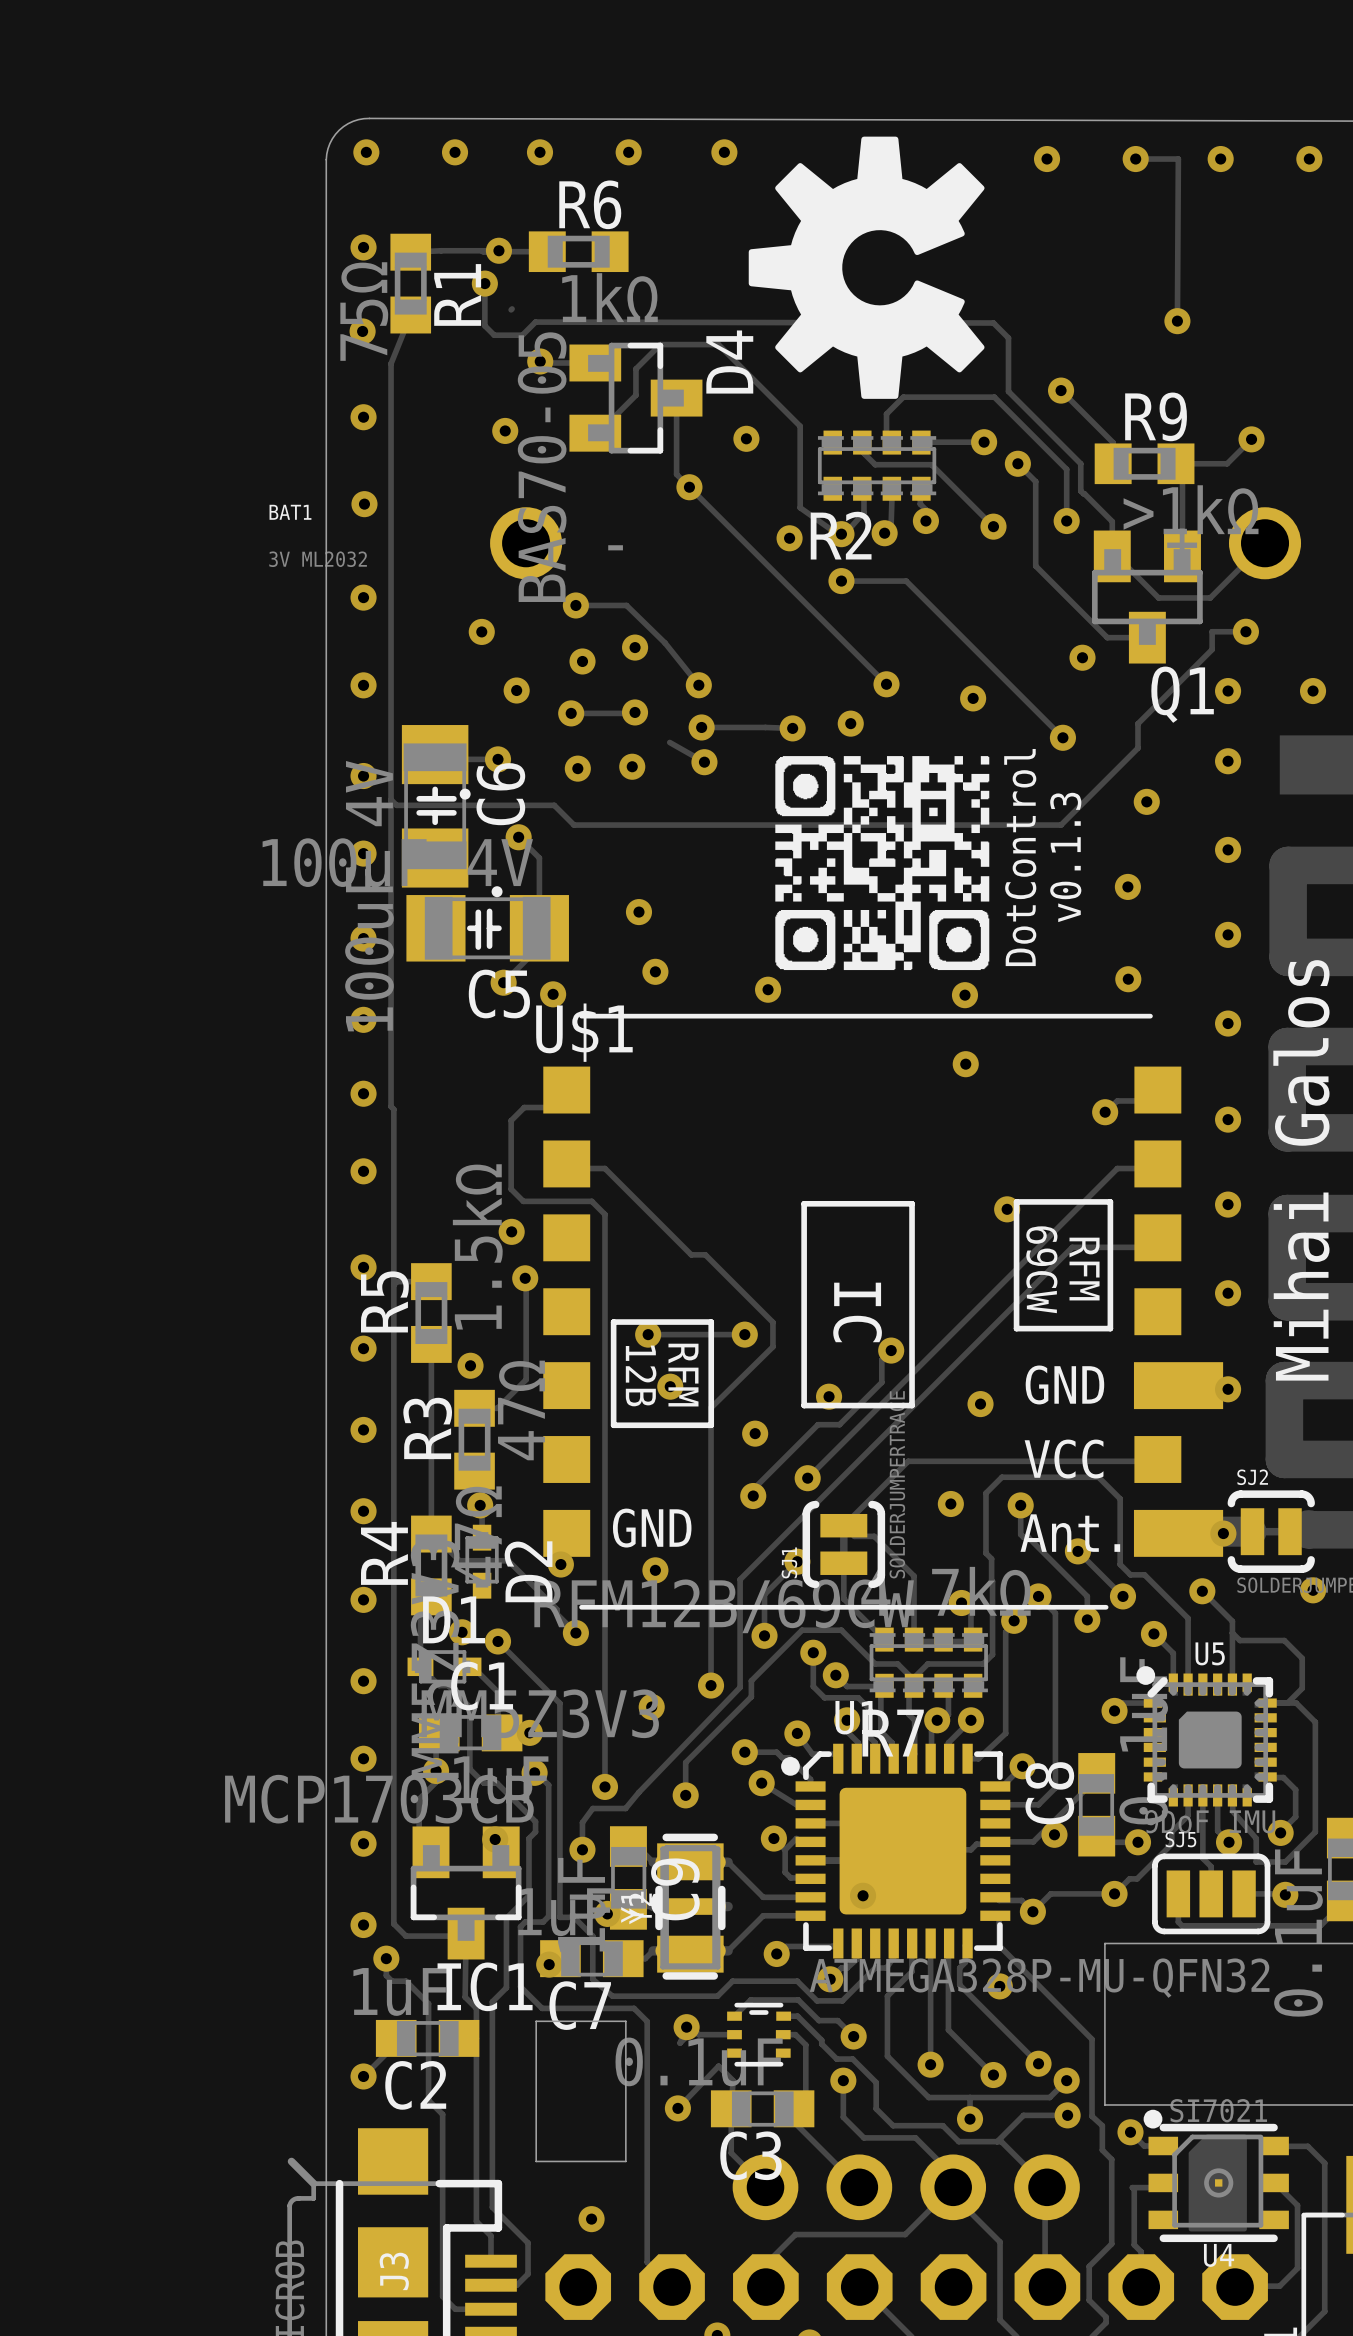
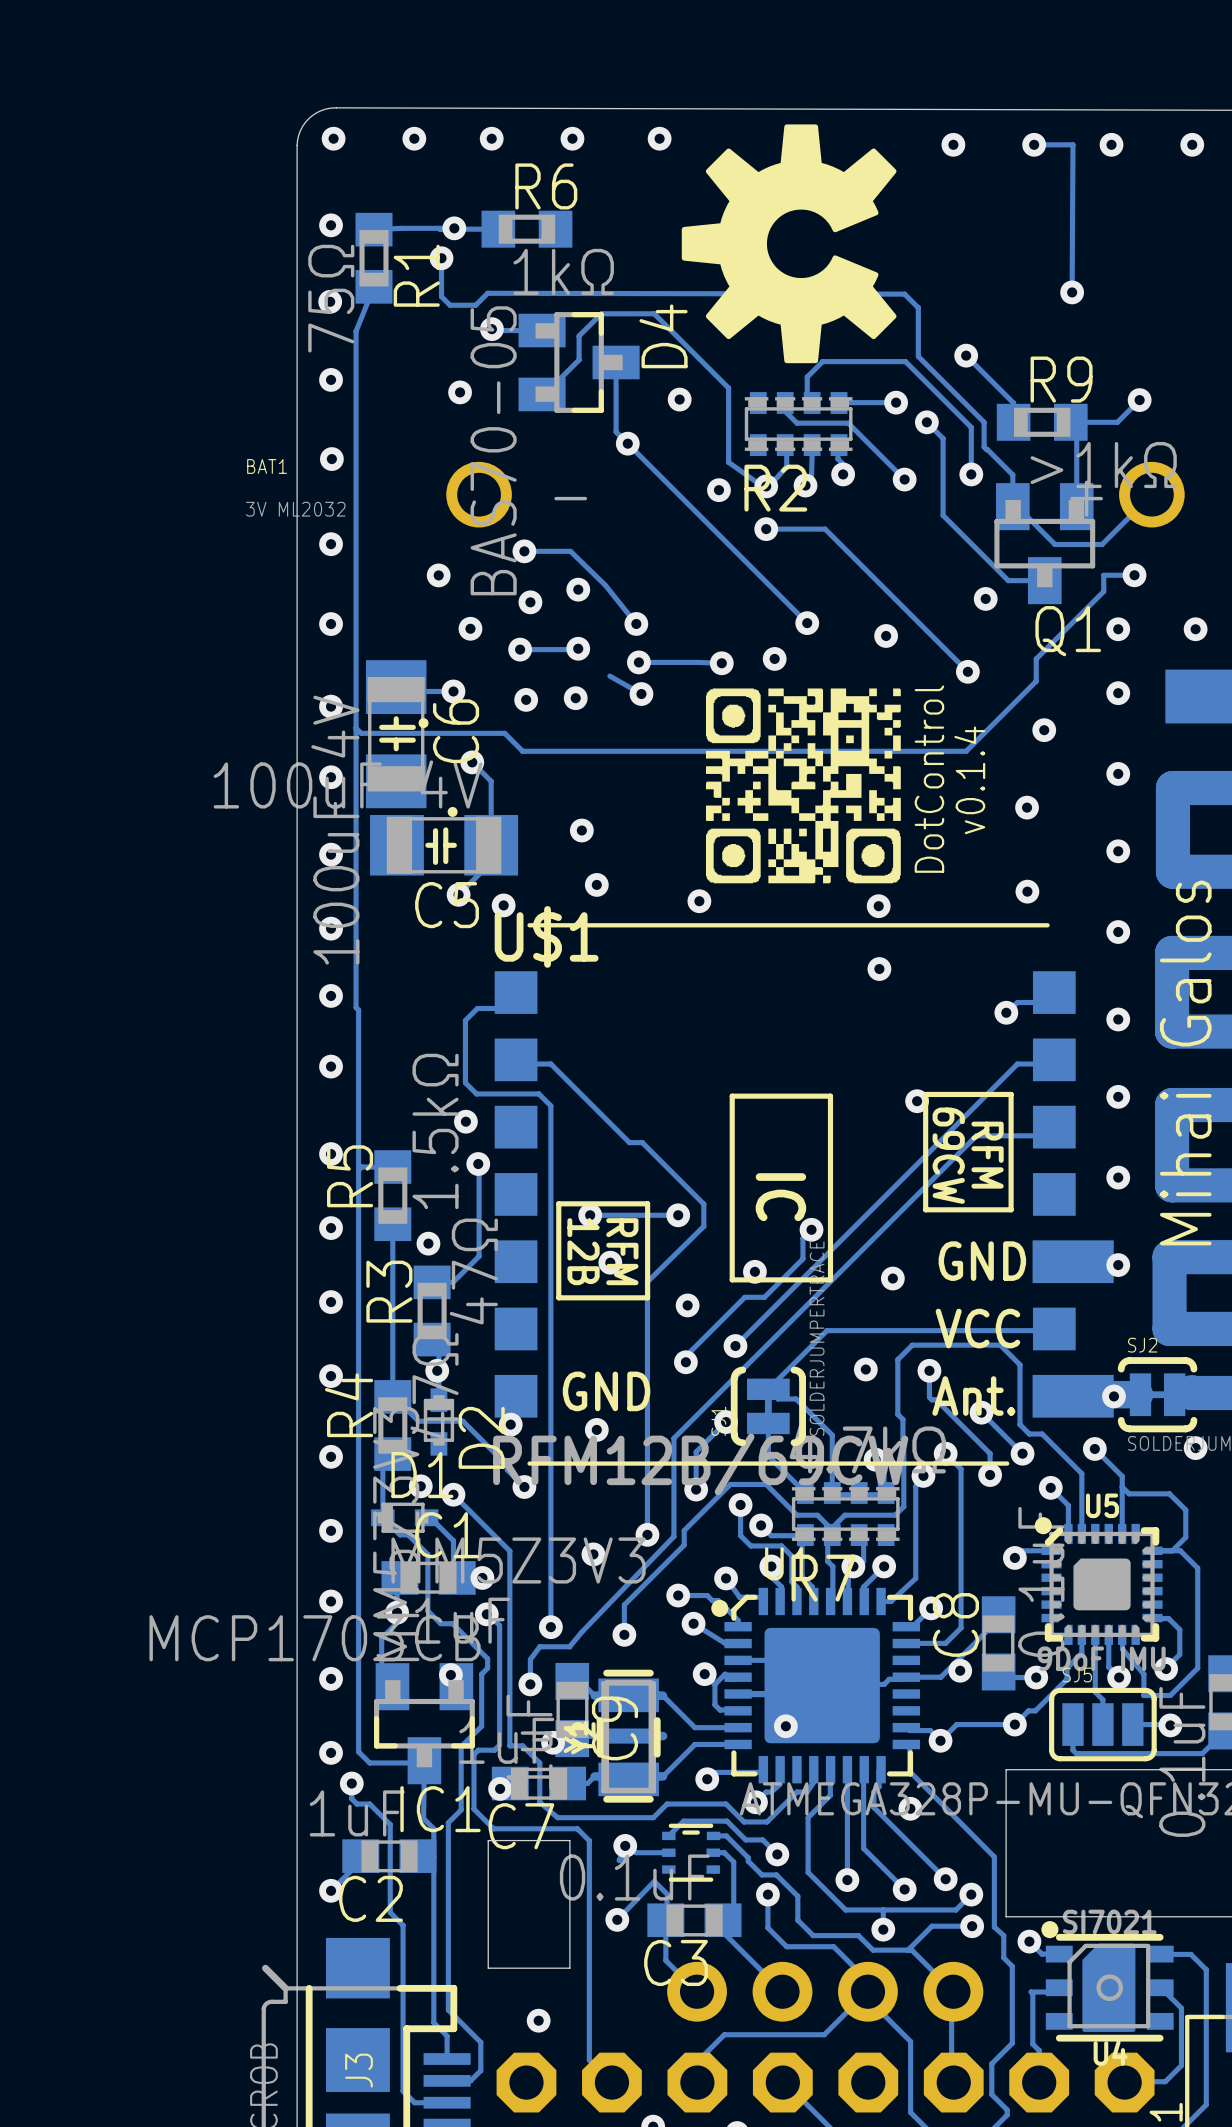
track: (512, 308) (511, 309) -> none
text: v0.1.3 (1065, 857) -> v0.1.4 (969, 780)

